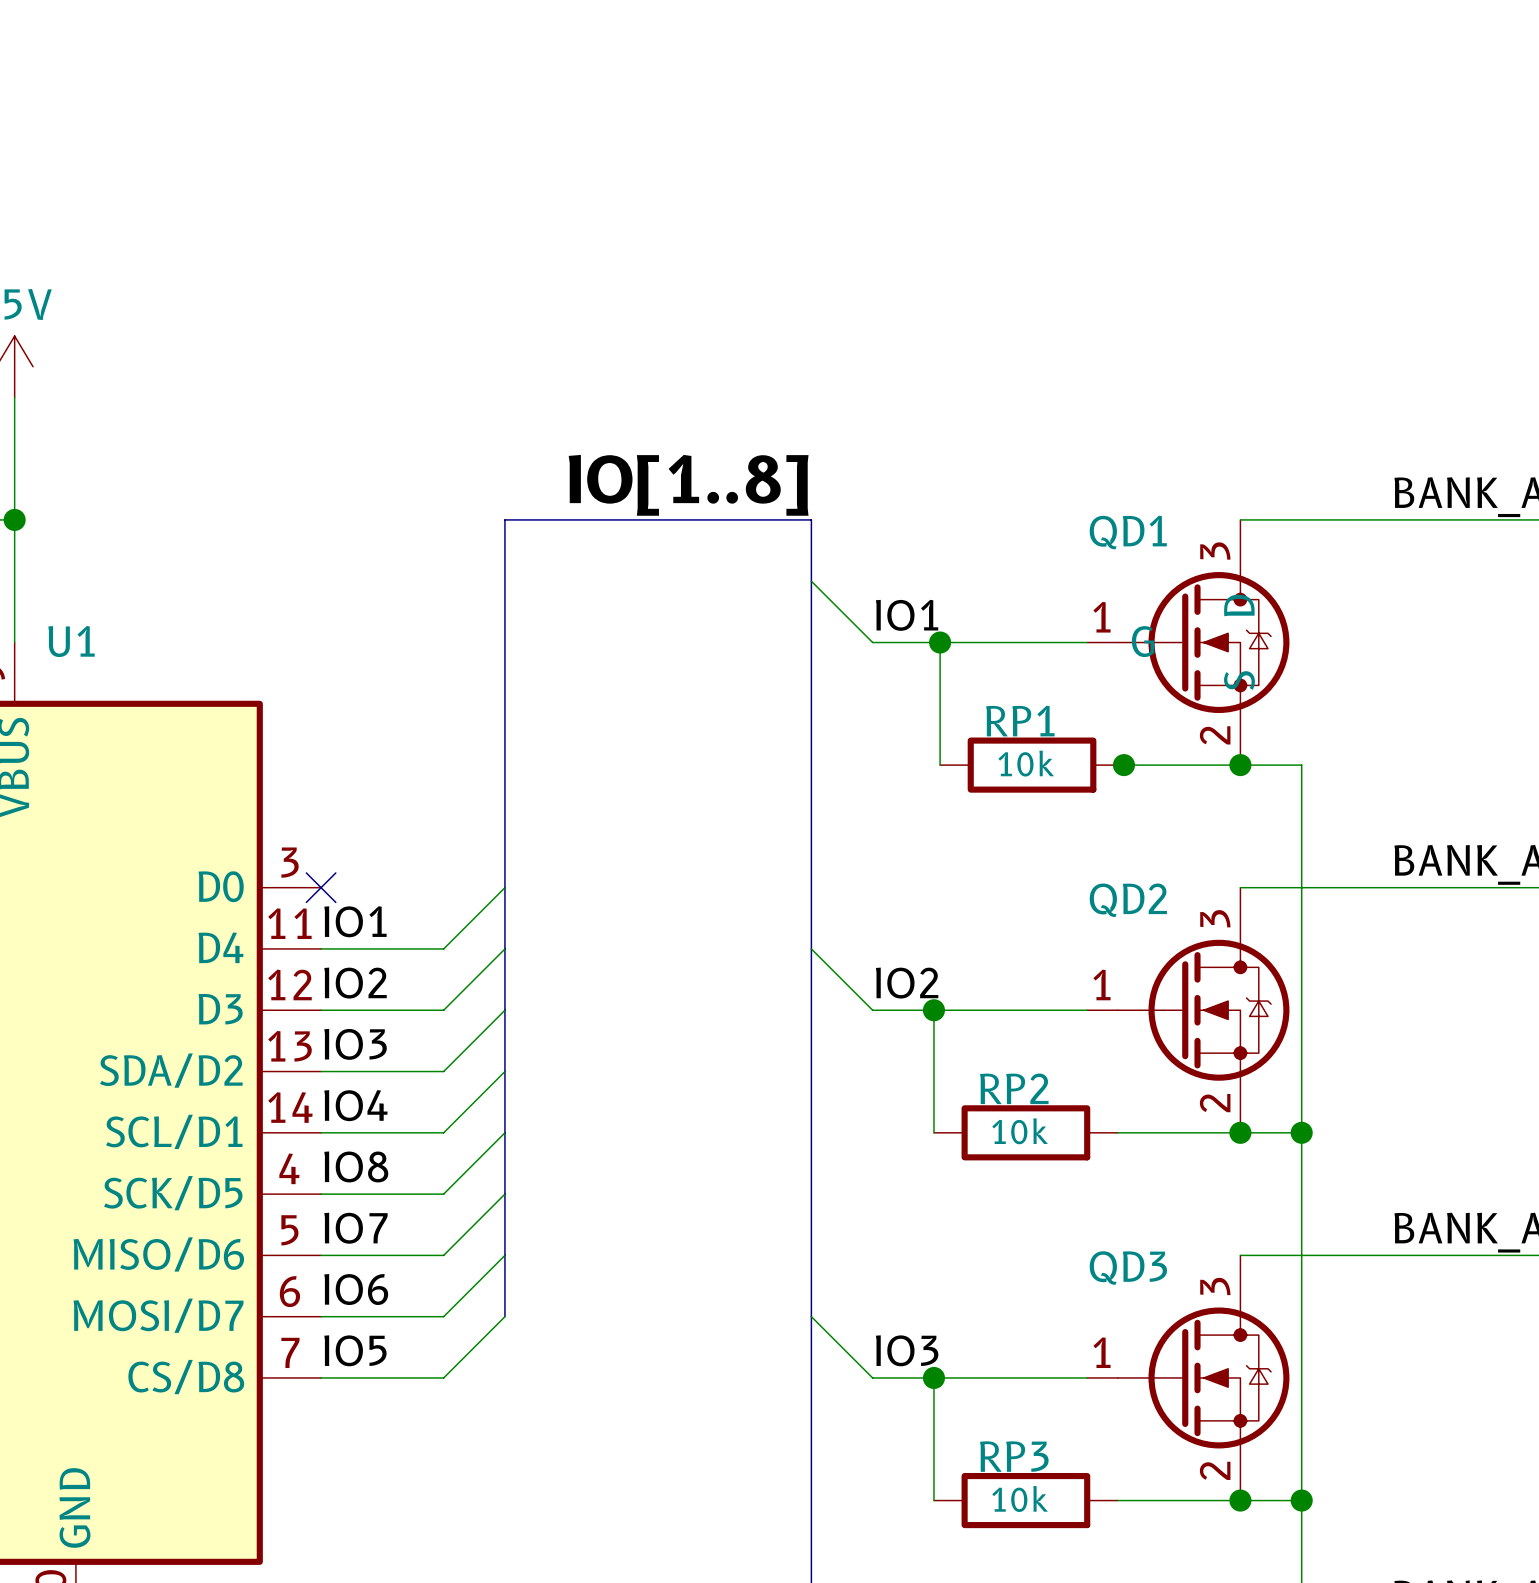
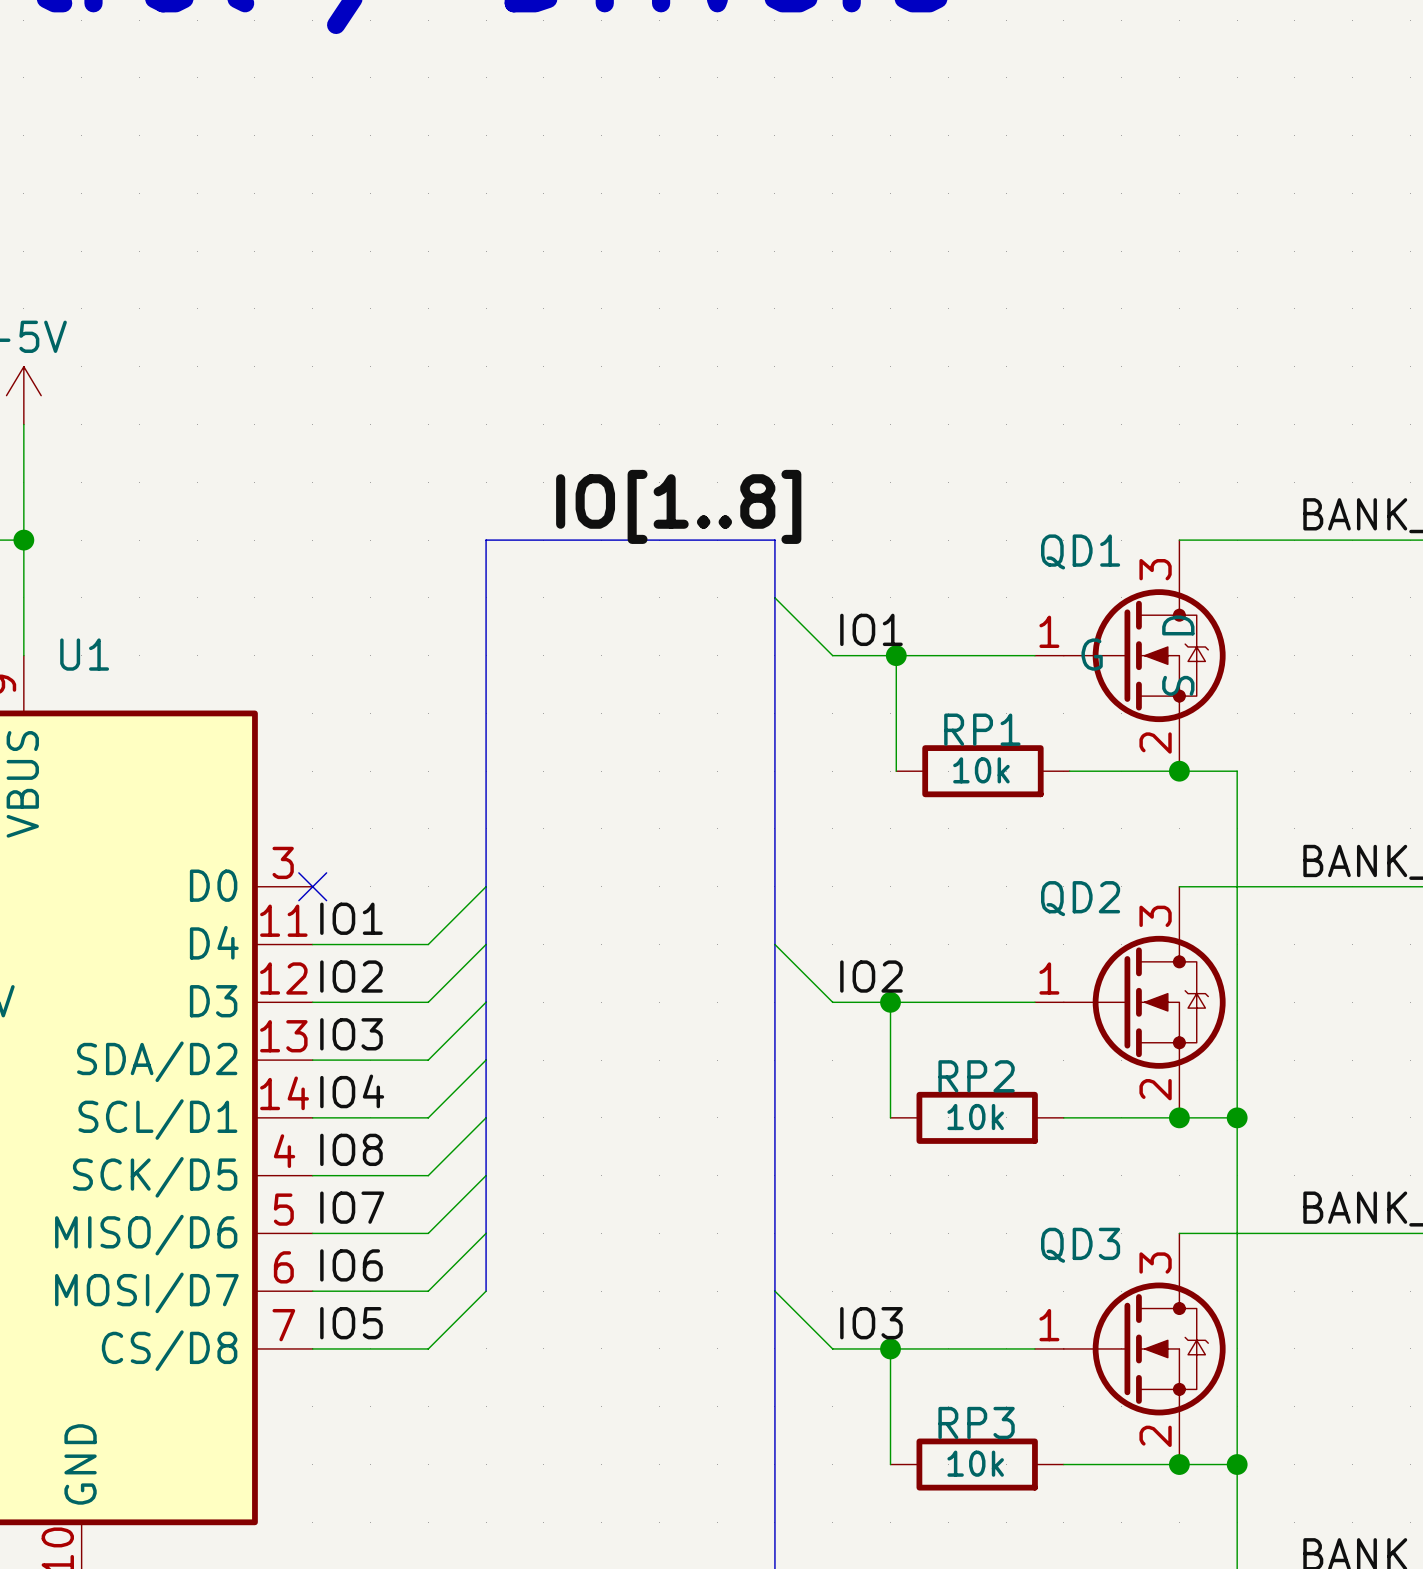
junction: (1123, 765) -> none

